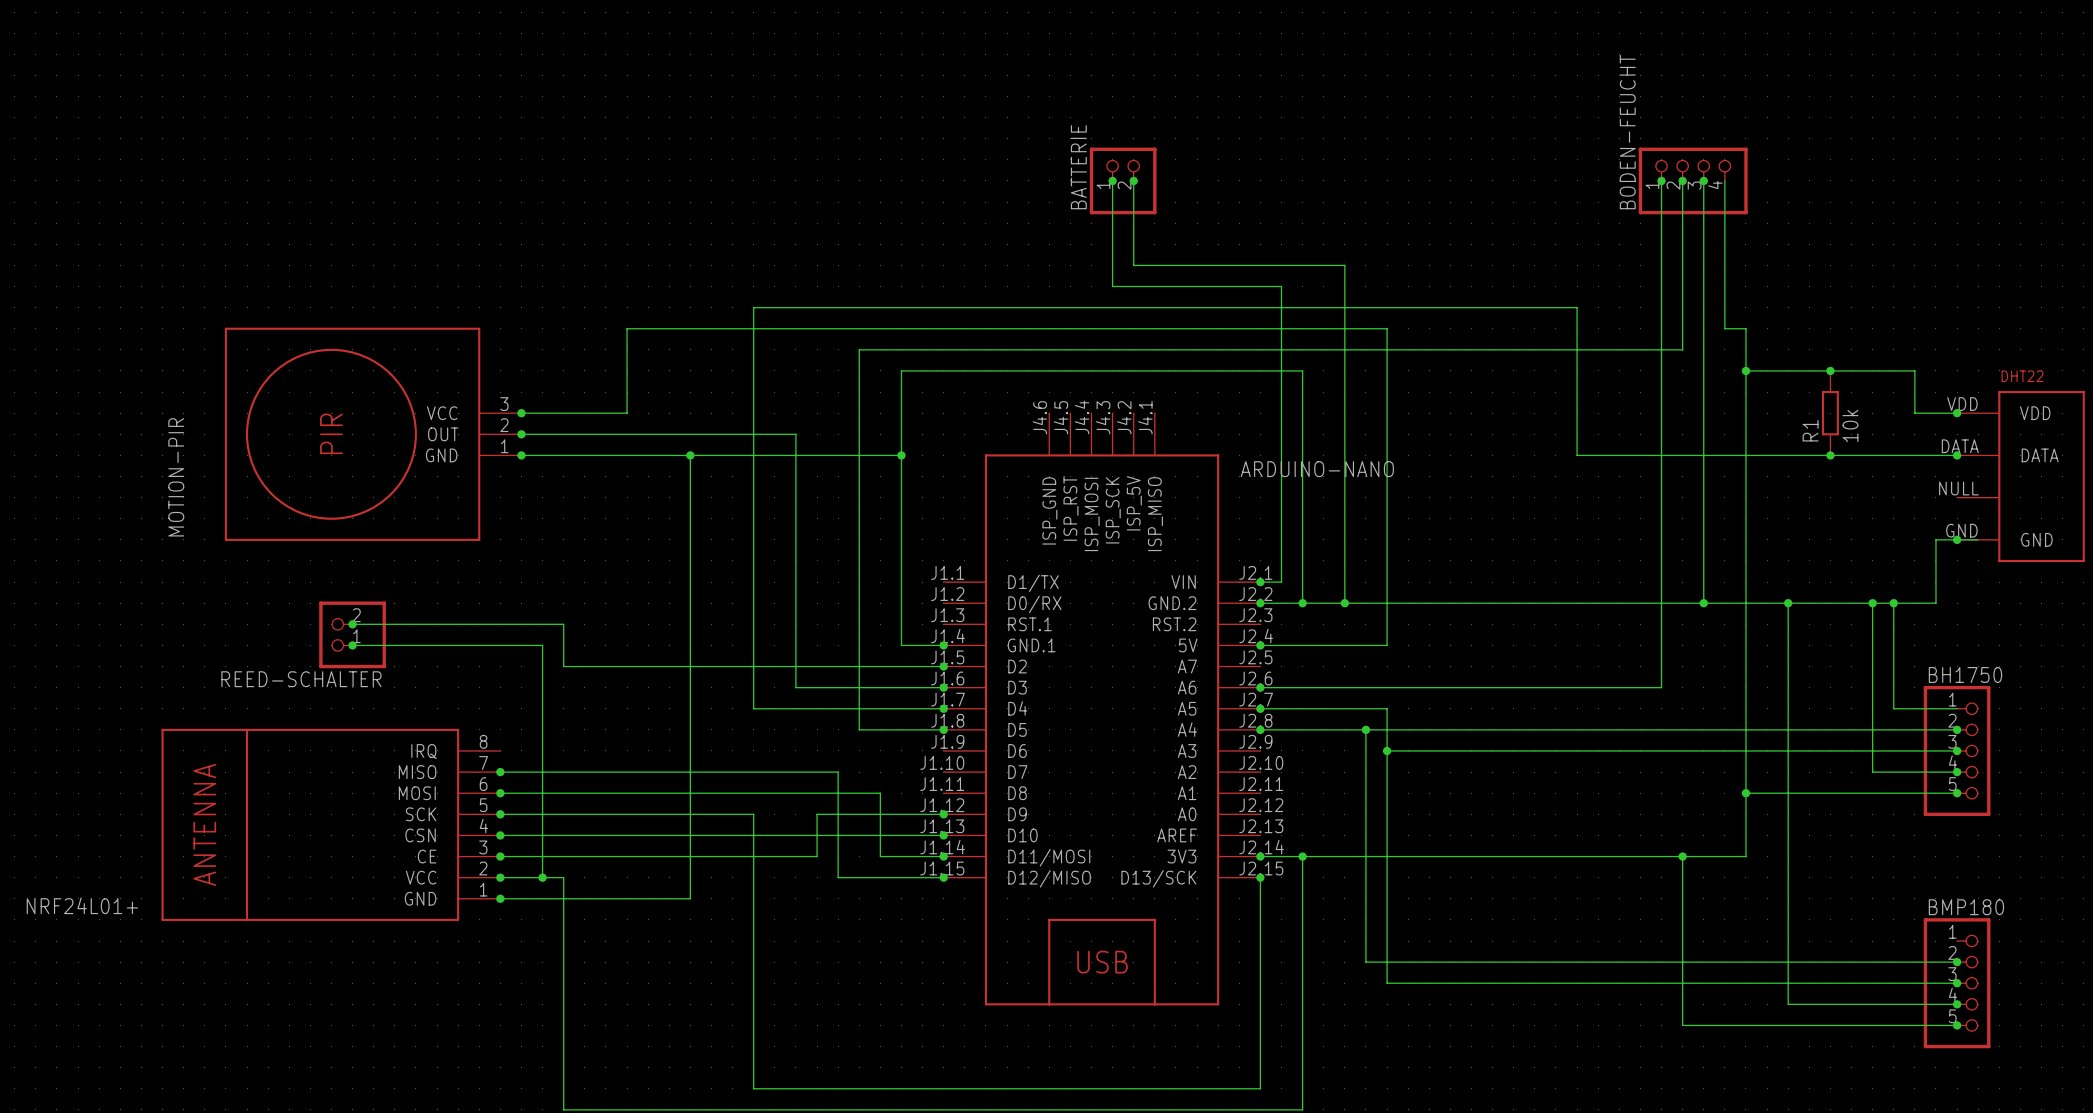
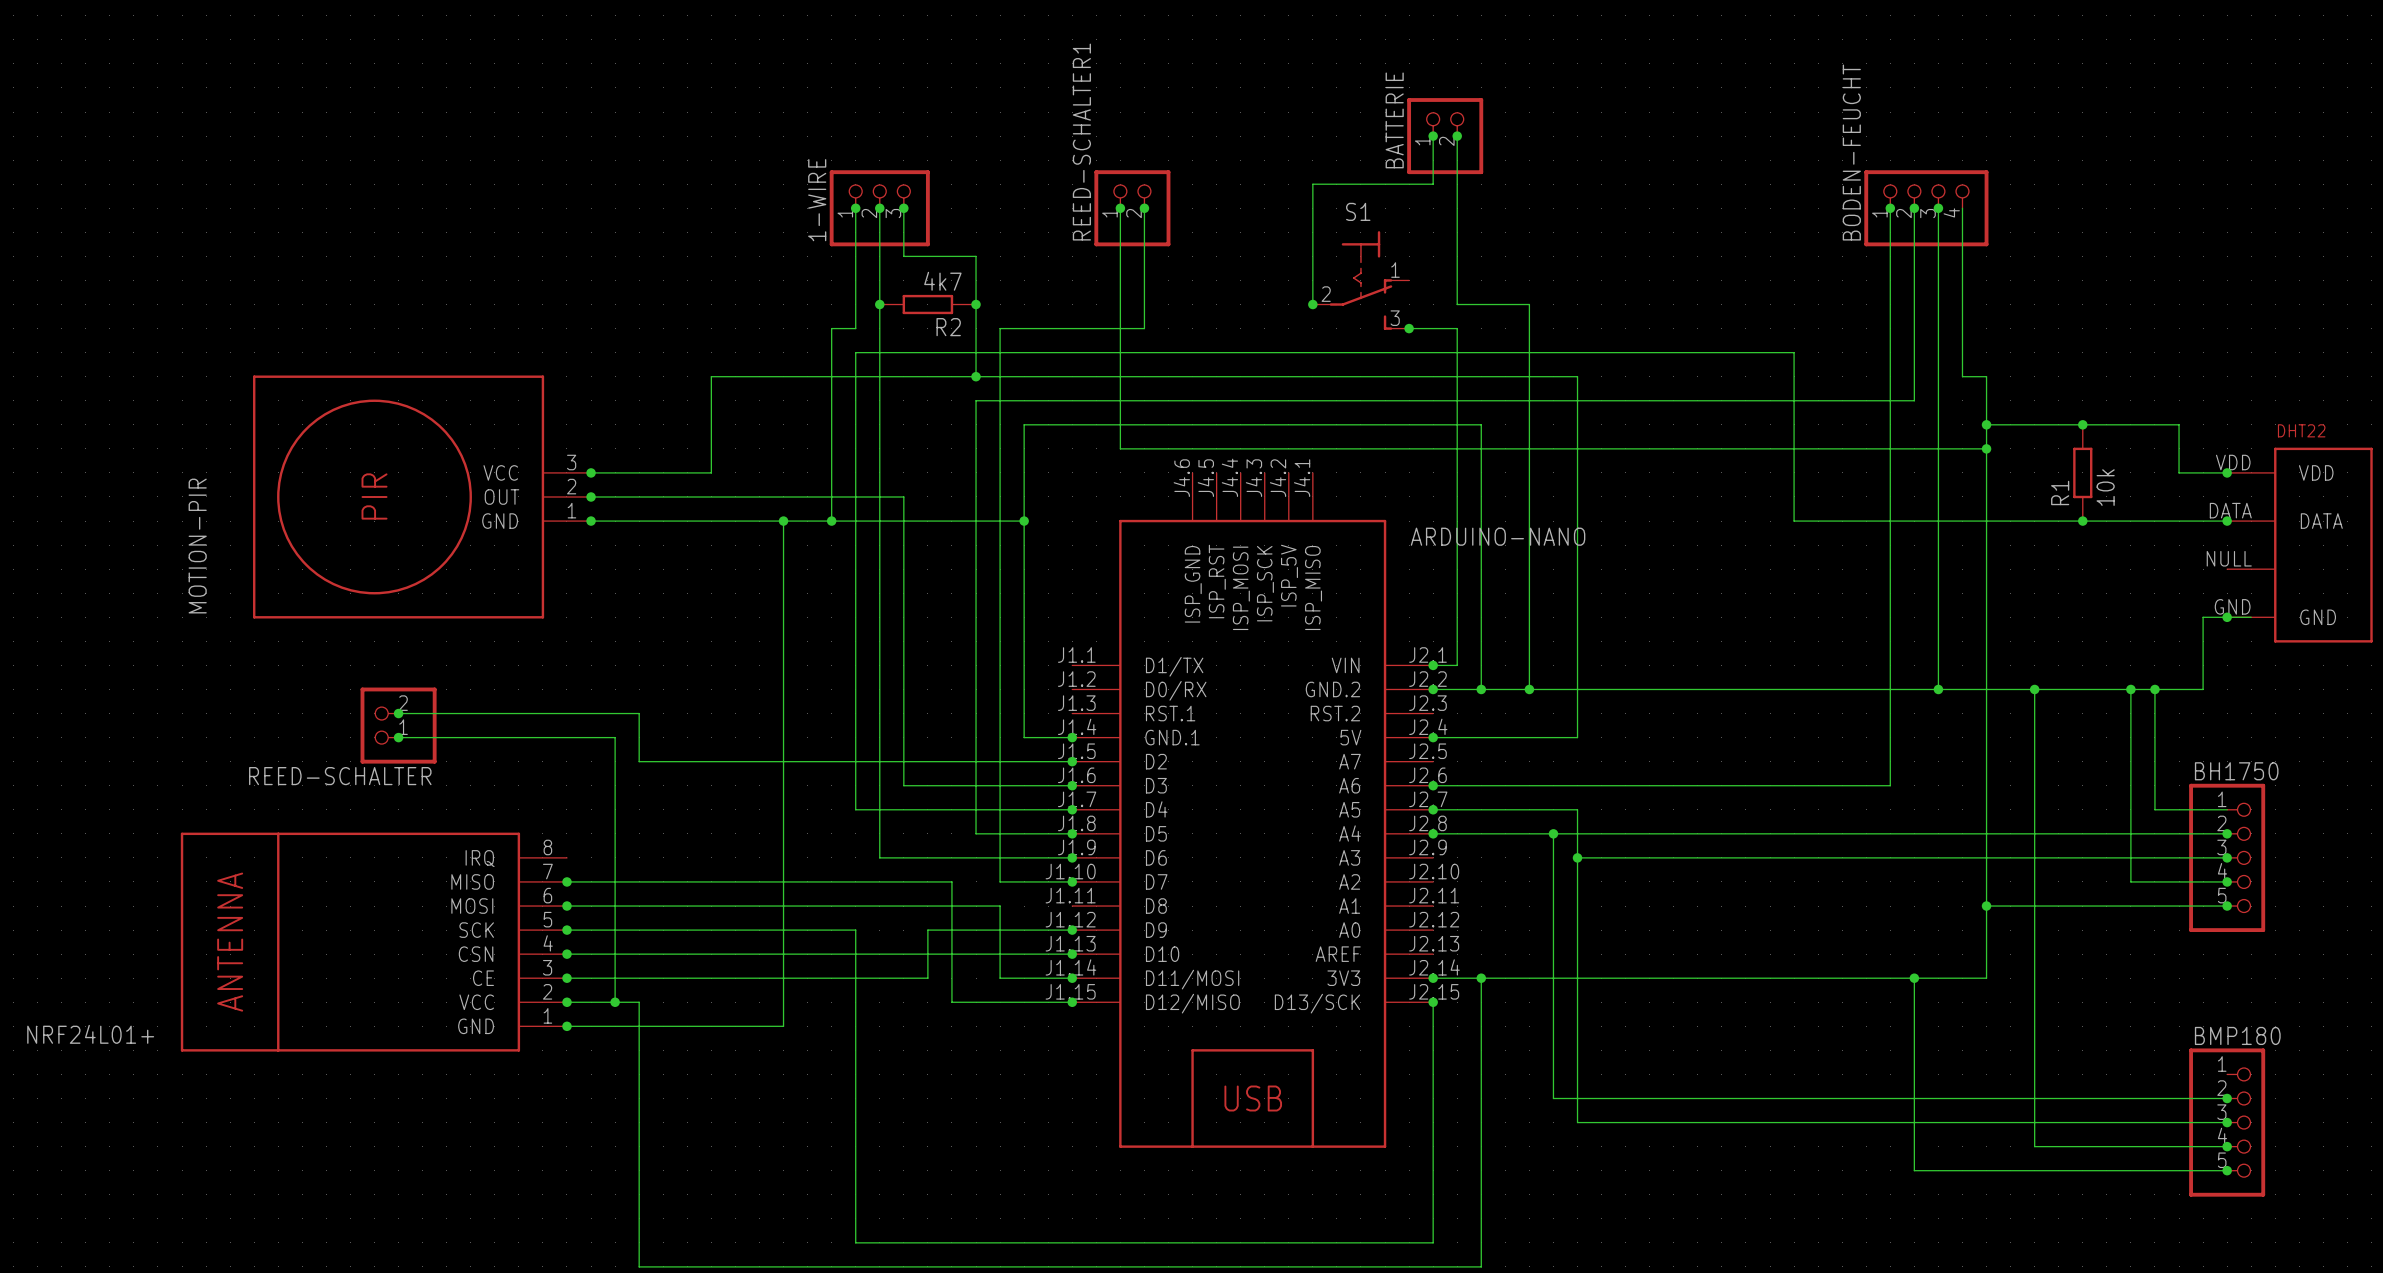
wire: none -> (1433, 136) (1433, 184) (1312, 184) (1312, 304)
junction: none -> (1433, 136)
junction: none -> (1457, 136)
wire: none -> (855, 208) (855, 328) (831, 328) (831, 521)
junction: none -> (855, 208)
wire: none -> (879, 208) (879, 857) (1072, 857)
1-WIRE: none -> (879, 208)
junction: none -> (879, 208)
wire: none -> (903, 208) (903, 256) (976, 256) (976, 376)
junction: none -> (903, 208)
wire: none -> (1120, 208) (1120, 448) (1986, 448)
junction: none -> (1120, 208)
REED-SCHALTER1: none -> (1132, 208)
wire: none -> (1144, 208) (1144, 328) (1000, 328) (1000, 881) (1072, 881)
junction: none -> (1144, 208)
wire: (1112, 180) (1112, 286) (1239, 286) -> none
junction: (1112, 180) -> none
BATTERIE position: (1123, 180) -> (1445, 136)
wire: (1133, 180) (1133, 265) (1281, 265) -> (1457, 136) (1457, 304)
junction: (1133, 180) -> none
S1: none -> (1360, 280)
junction: none -> (879, 304)
R2: none -> 4k7 (927, 304)
junction: none -> (976, 304)
junction: none -> (1312, 304)
junction: none -> (1409, 328)
junction: none -> (976, 376)
junction: none -> (1986, 448)
junction: none -> (831, 521)
junction: none -> (1072, 857)
junction: none -> (1072, 881)

